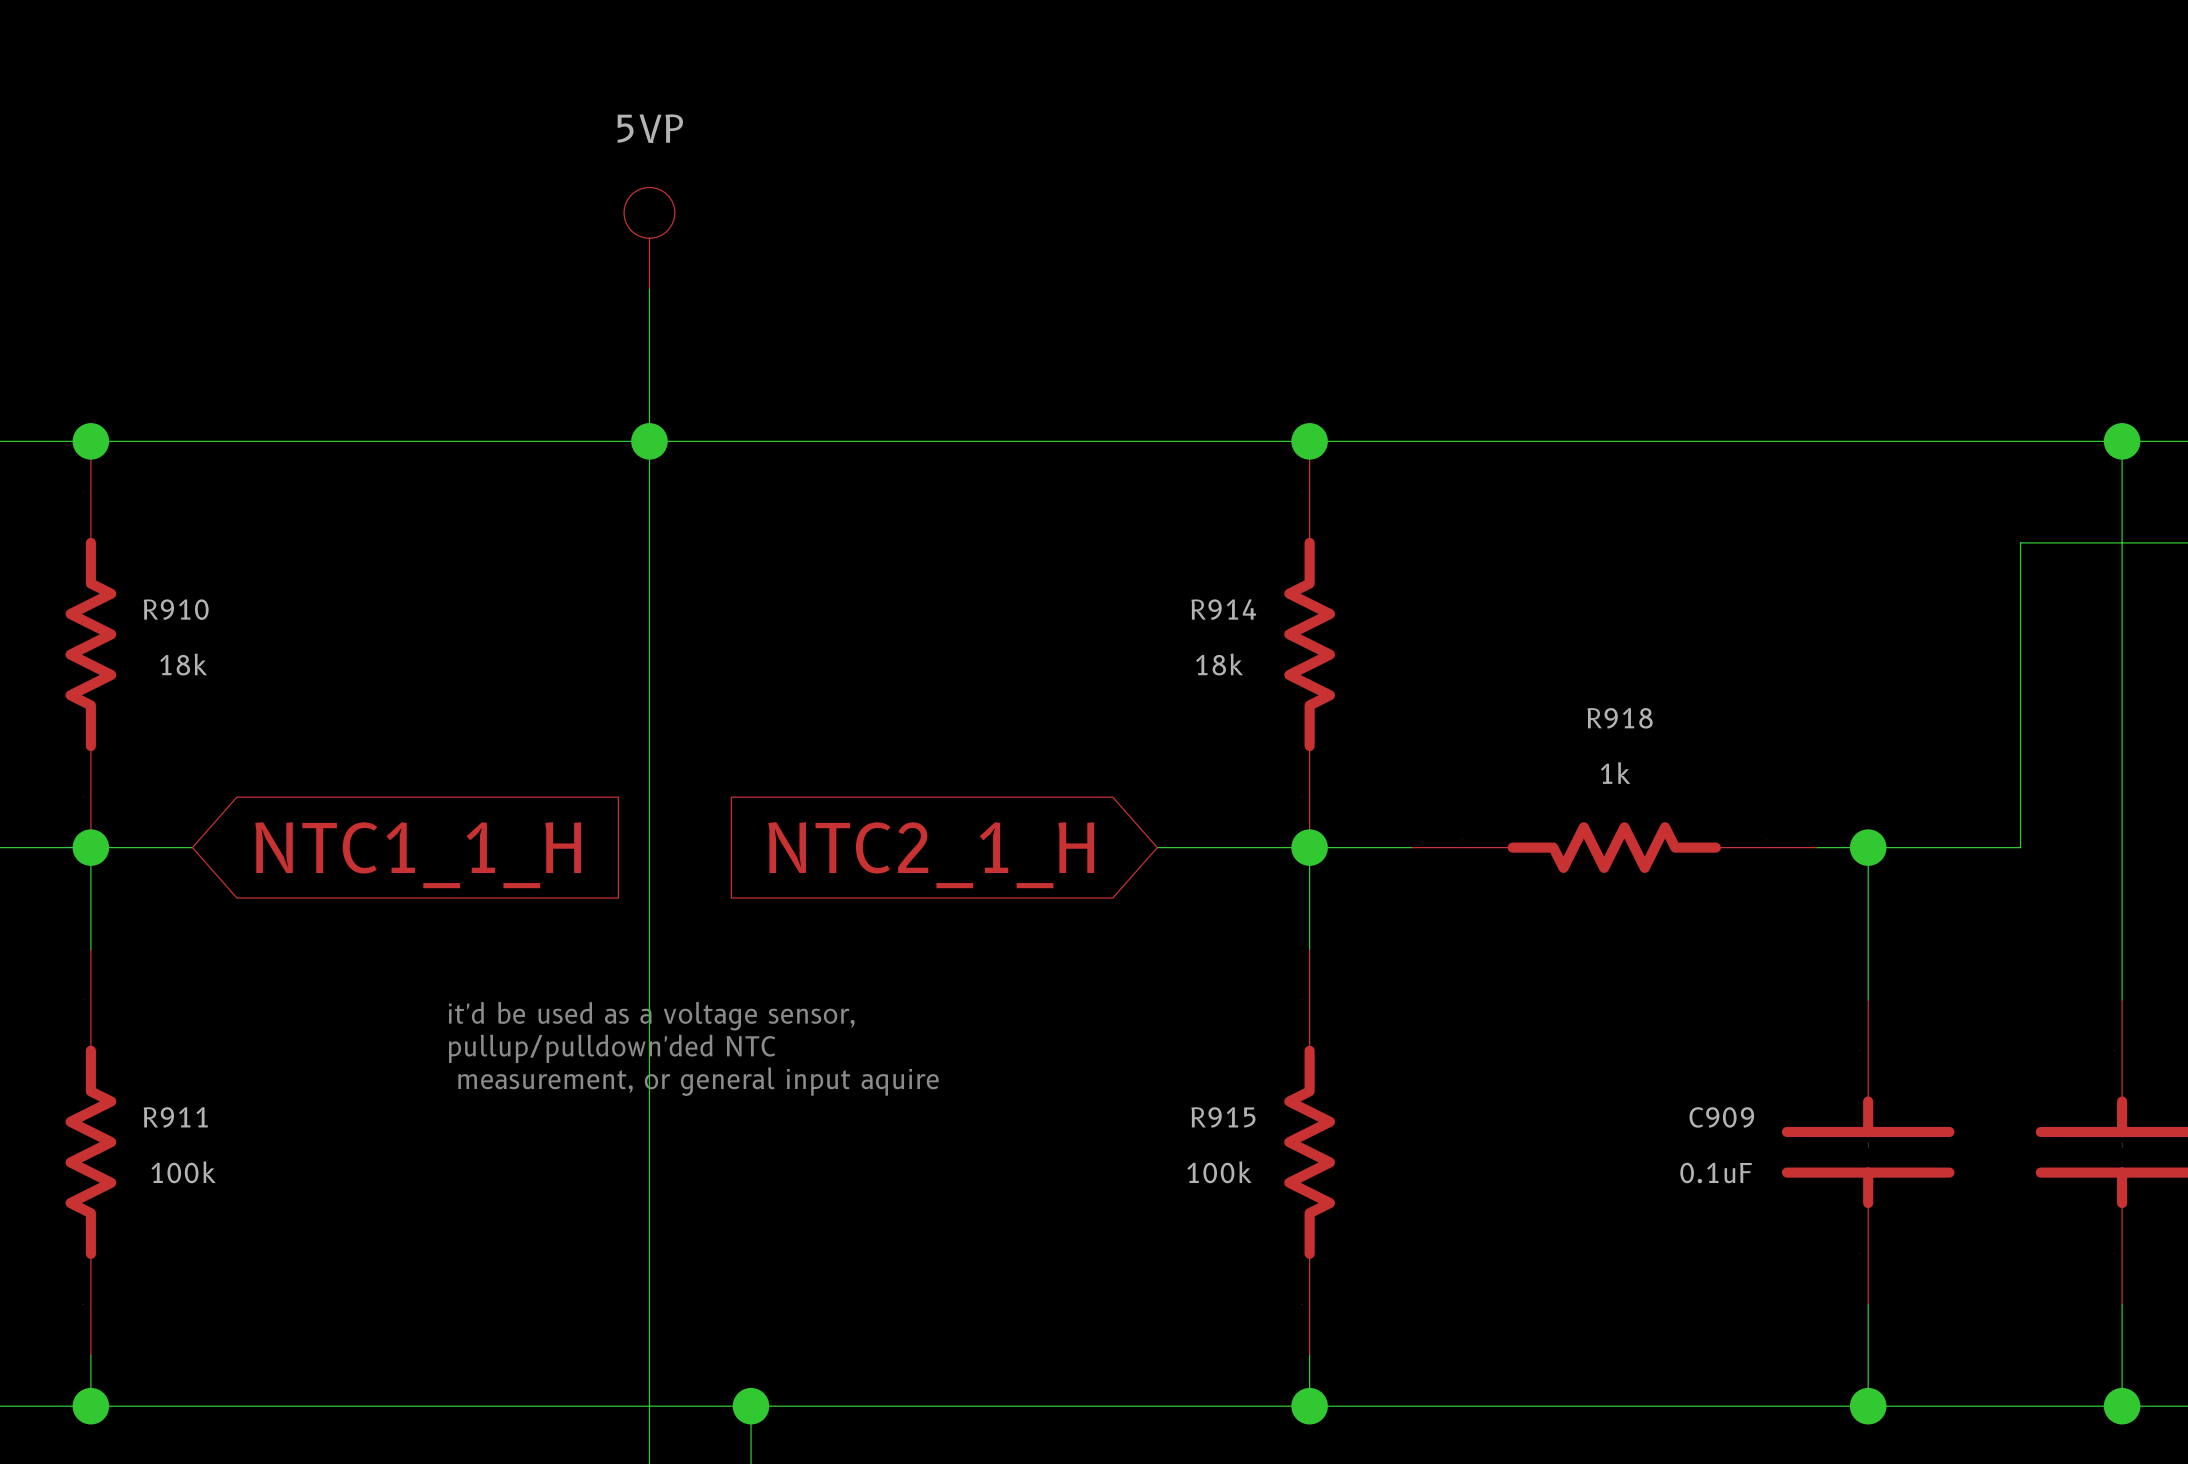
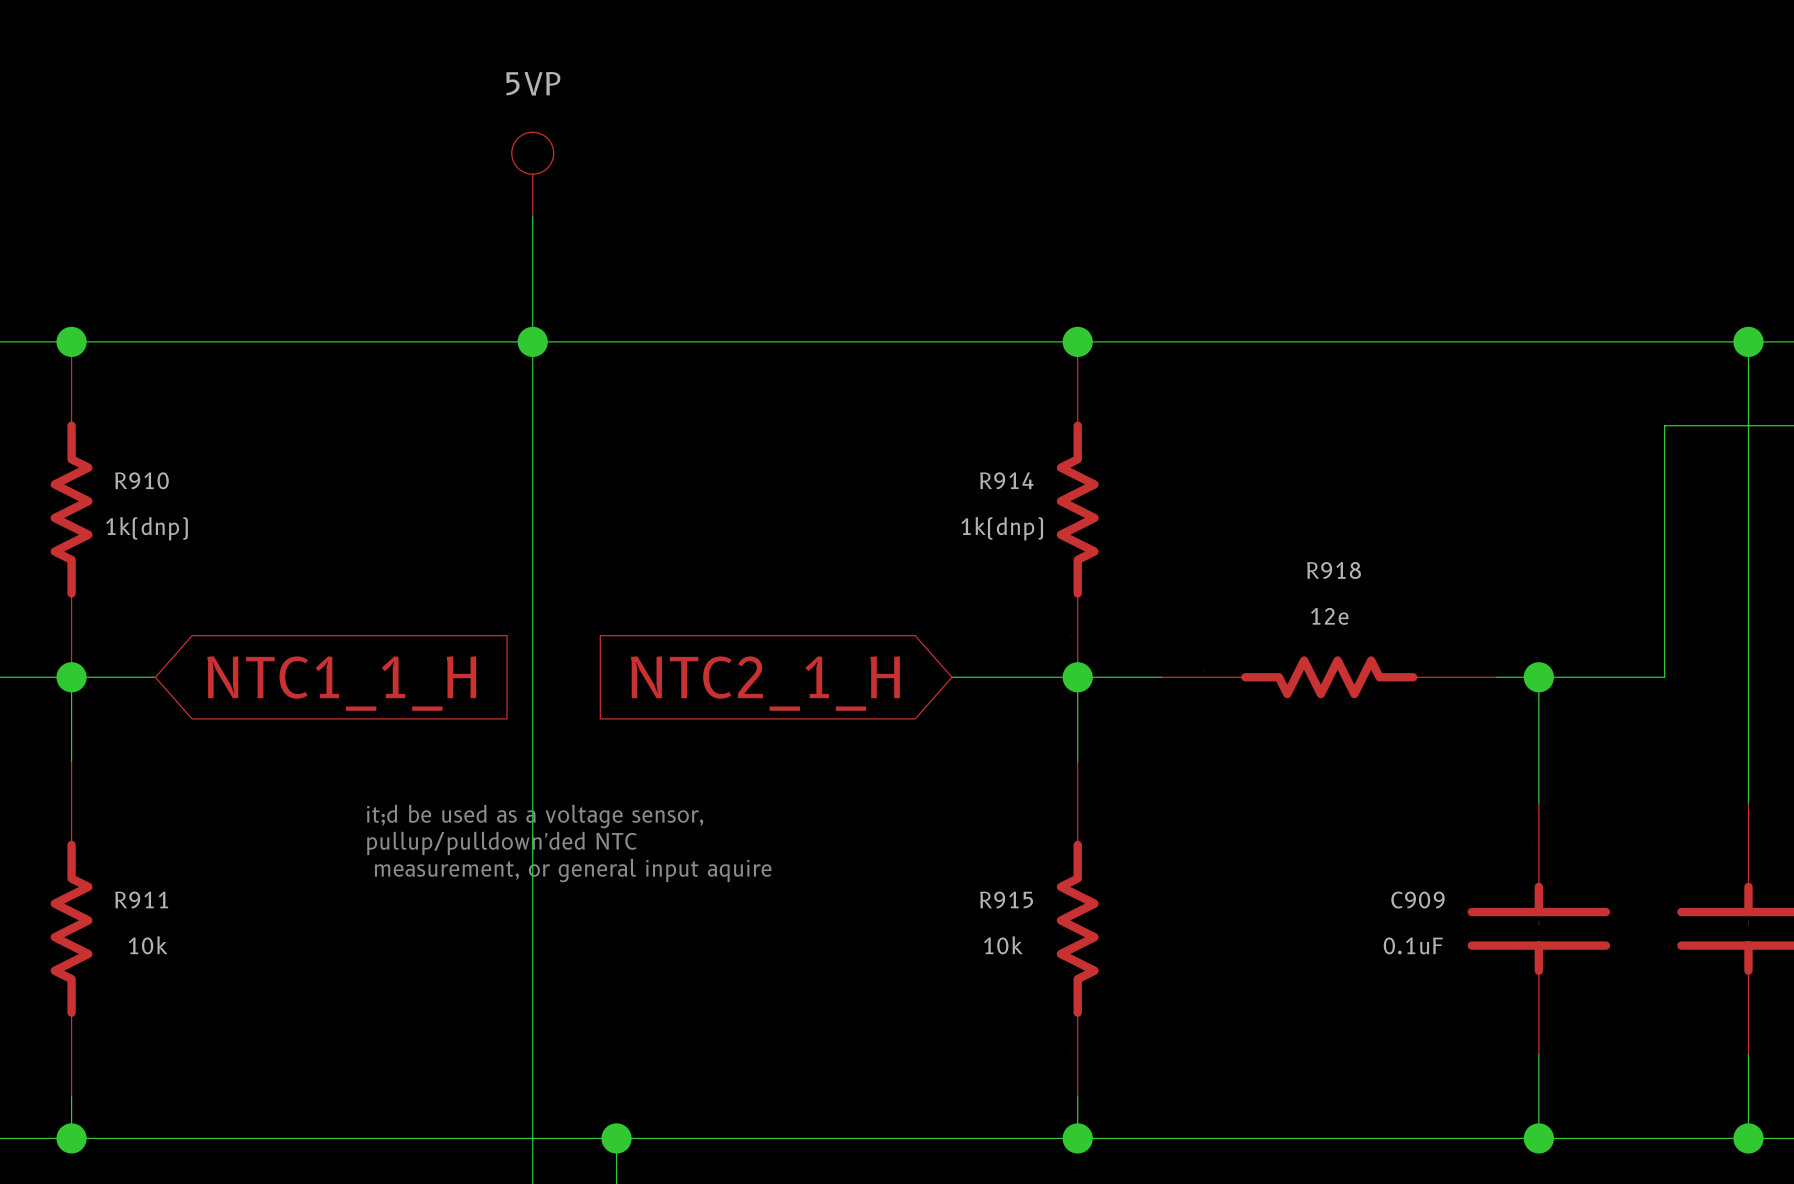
R910 value: 18k (183, 664) -> 1k(dnp) (147, 528)
R914 value: 18k (1219, 664) -> 1k(dnp) (1002, 528)
R918 value: 1k (1615, 773) -> 12e (1329, 616)
text: it'd be used as a voltage sensor, (651, 1016) -> it;d be used as a voltage sensor, (535, 816)
R911 value: 100k (183, 1172) -> 10k (148, 945)
R915 value: 100k (1219, 1172) -> 10k (1003, 945)

